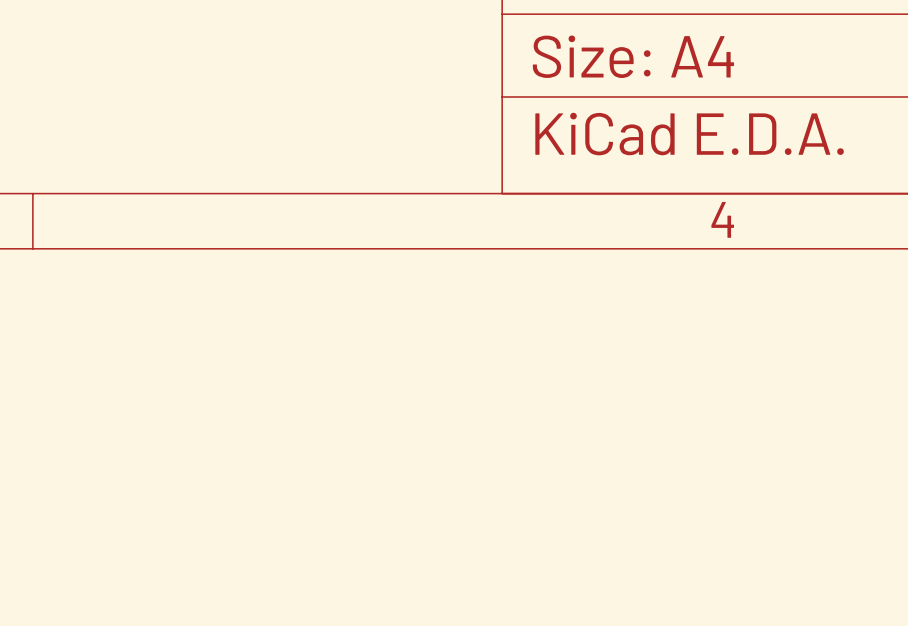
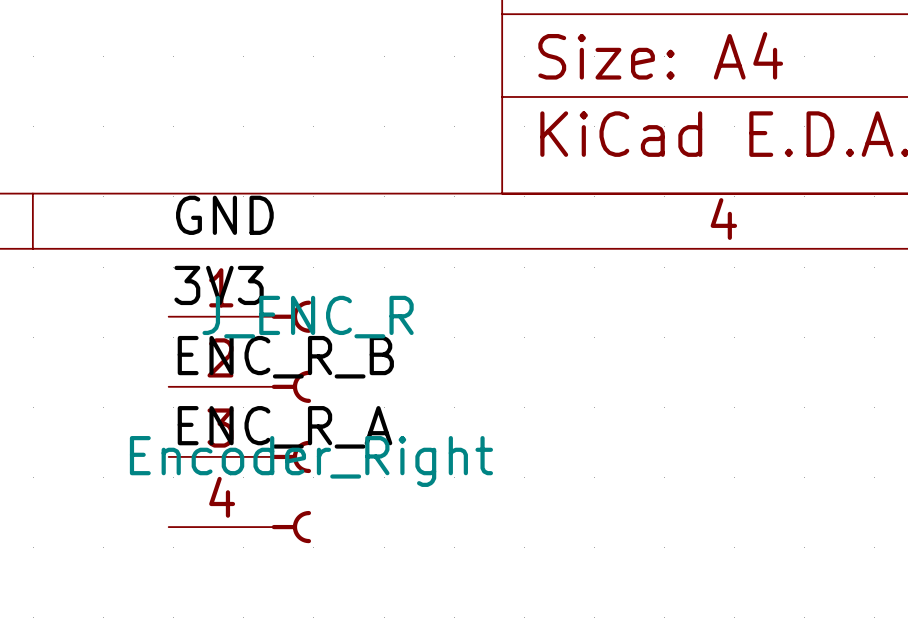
label: none -> GND (224, 215)
label: none -> 3V3 (219, 285)
label: none -> ENC_R_B (285, 357)
J_ENC_R: none -> Encoder_Right (239, 421)
label: none -> ENC_R_A (284, 427)

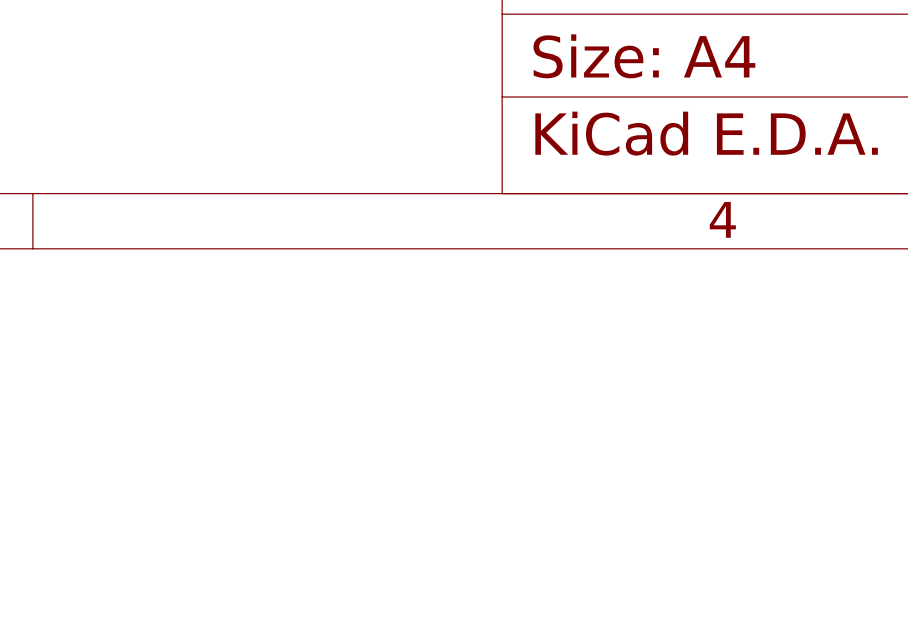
label: GND (224, 215) -> none
label: 3V3 (219, 285) -> none
label: ENC_R_B (285, 357) -> none
J_ENC_R: Encoder_Right (239, 421) -> none
label: ENC_R_A (284, 427) -> none

